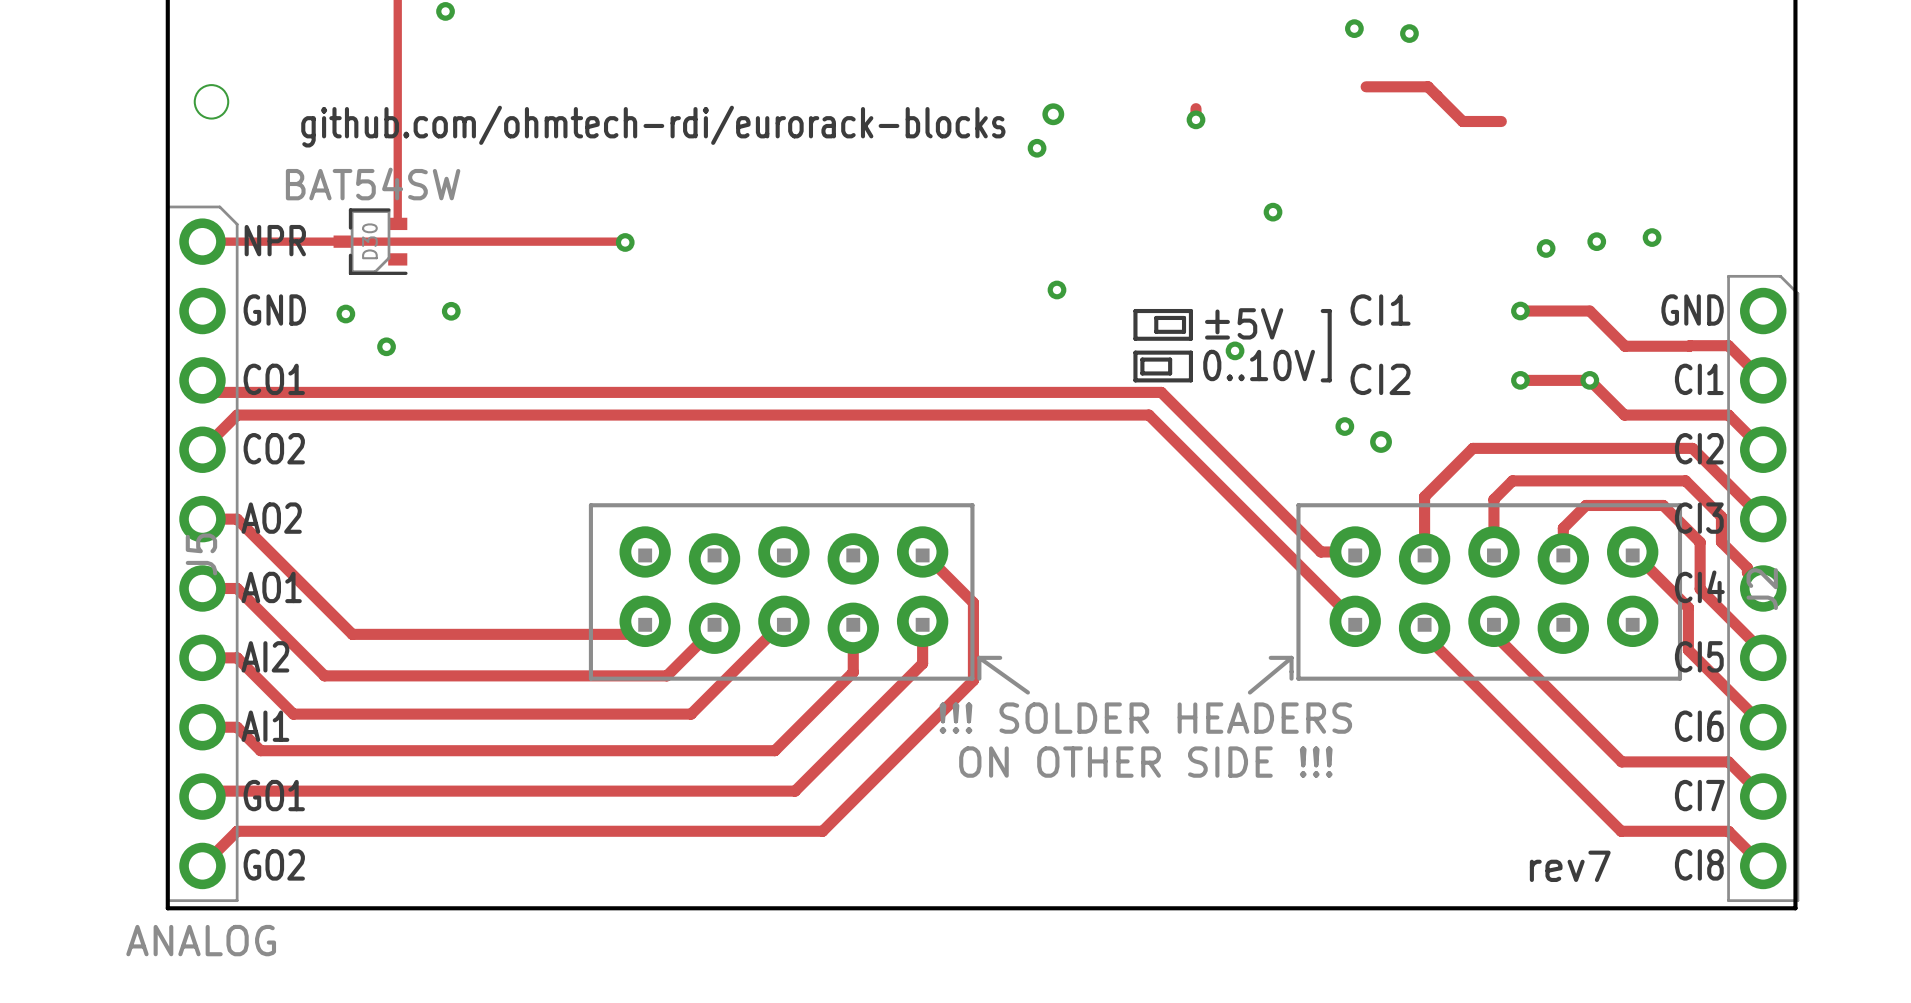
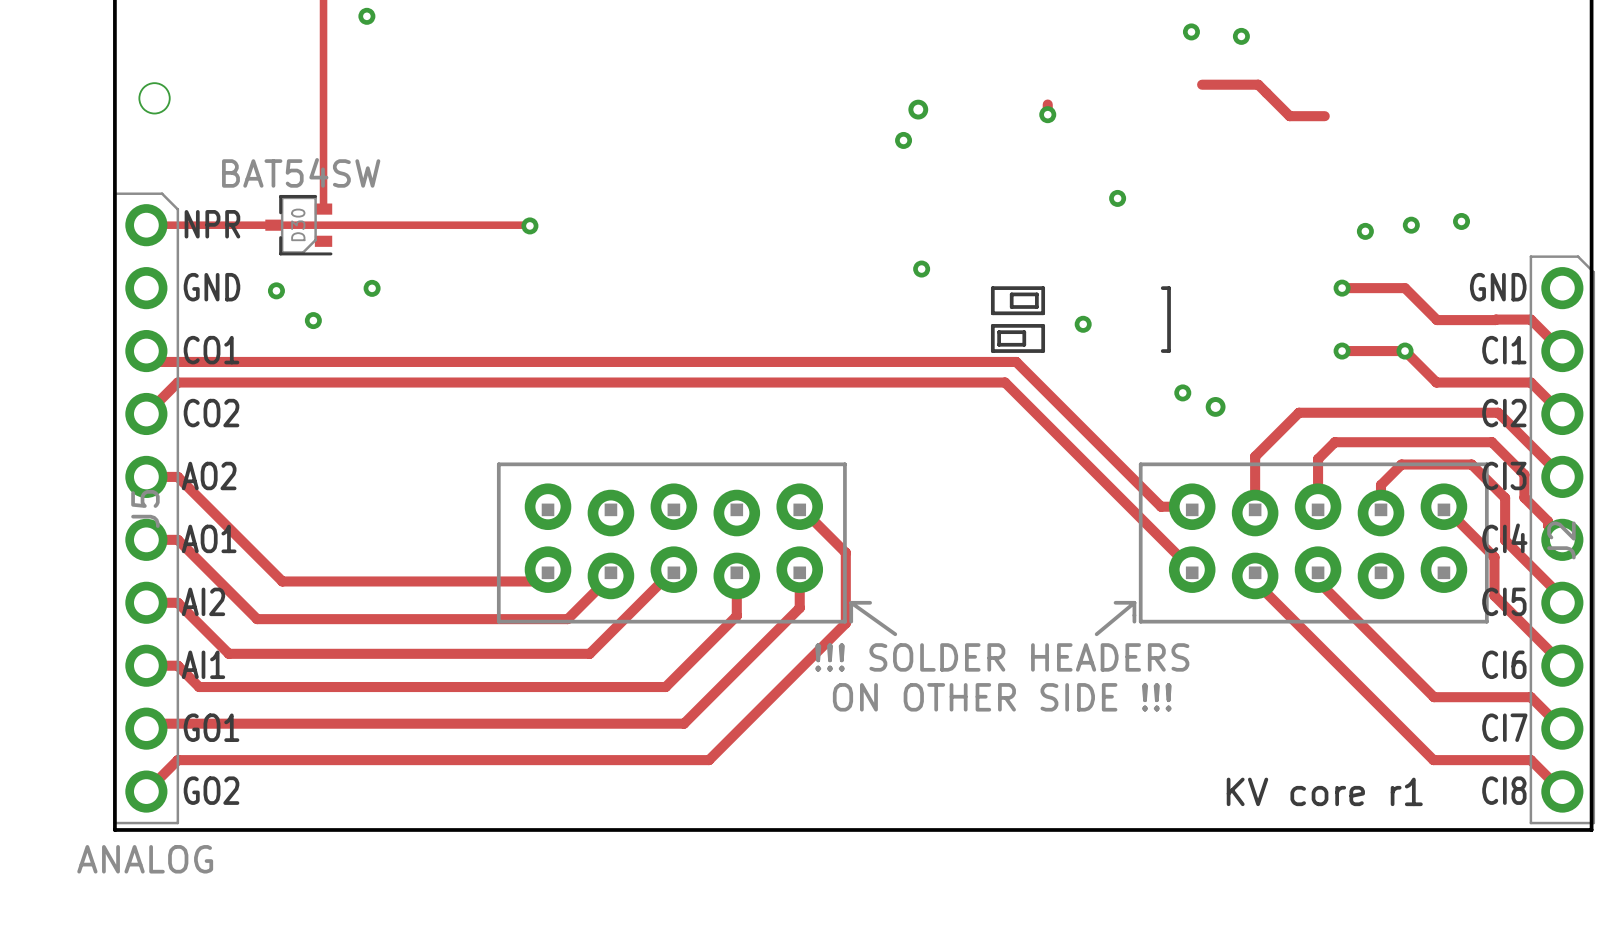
text: github.com/ohmtech-rdi/eurorack-blocks (653, 126) -> none
text: CI1 (1380, 310) -> none
text: ±5V (1244, 323) -> none
text: 0..10V (1259, 365) -> none
text: CI2 (1380, 379) -> none
text: rev7 (1570, 866) -> KV core r1 (1324, 791)

